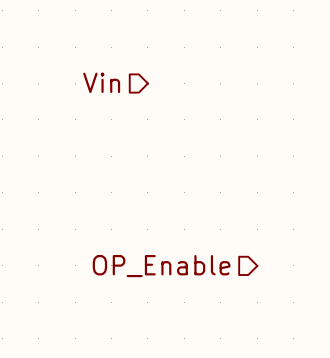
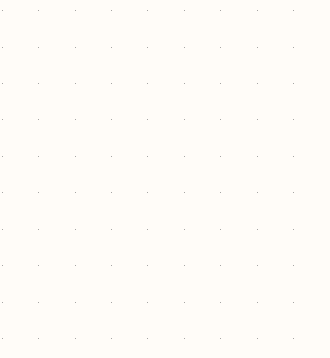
hierarchical label: Vin (101, 82) -> none
hierarchical label: OP_Enable (161, 266) -> none

